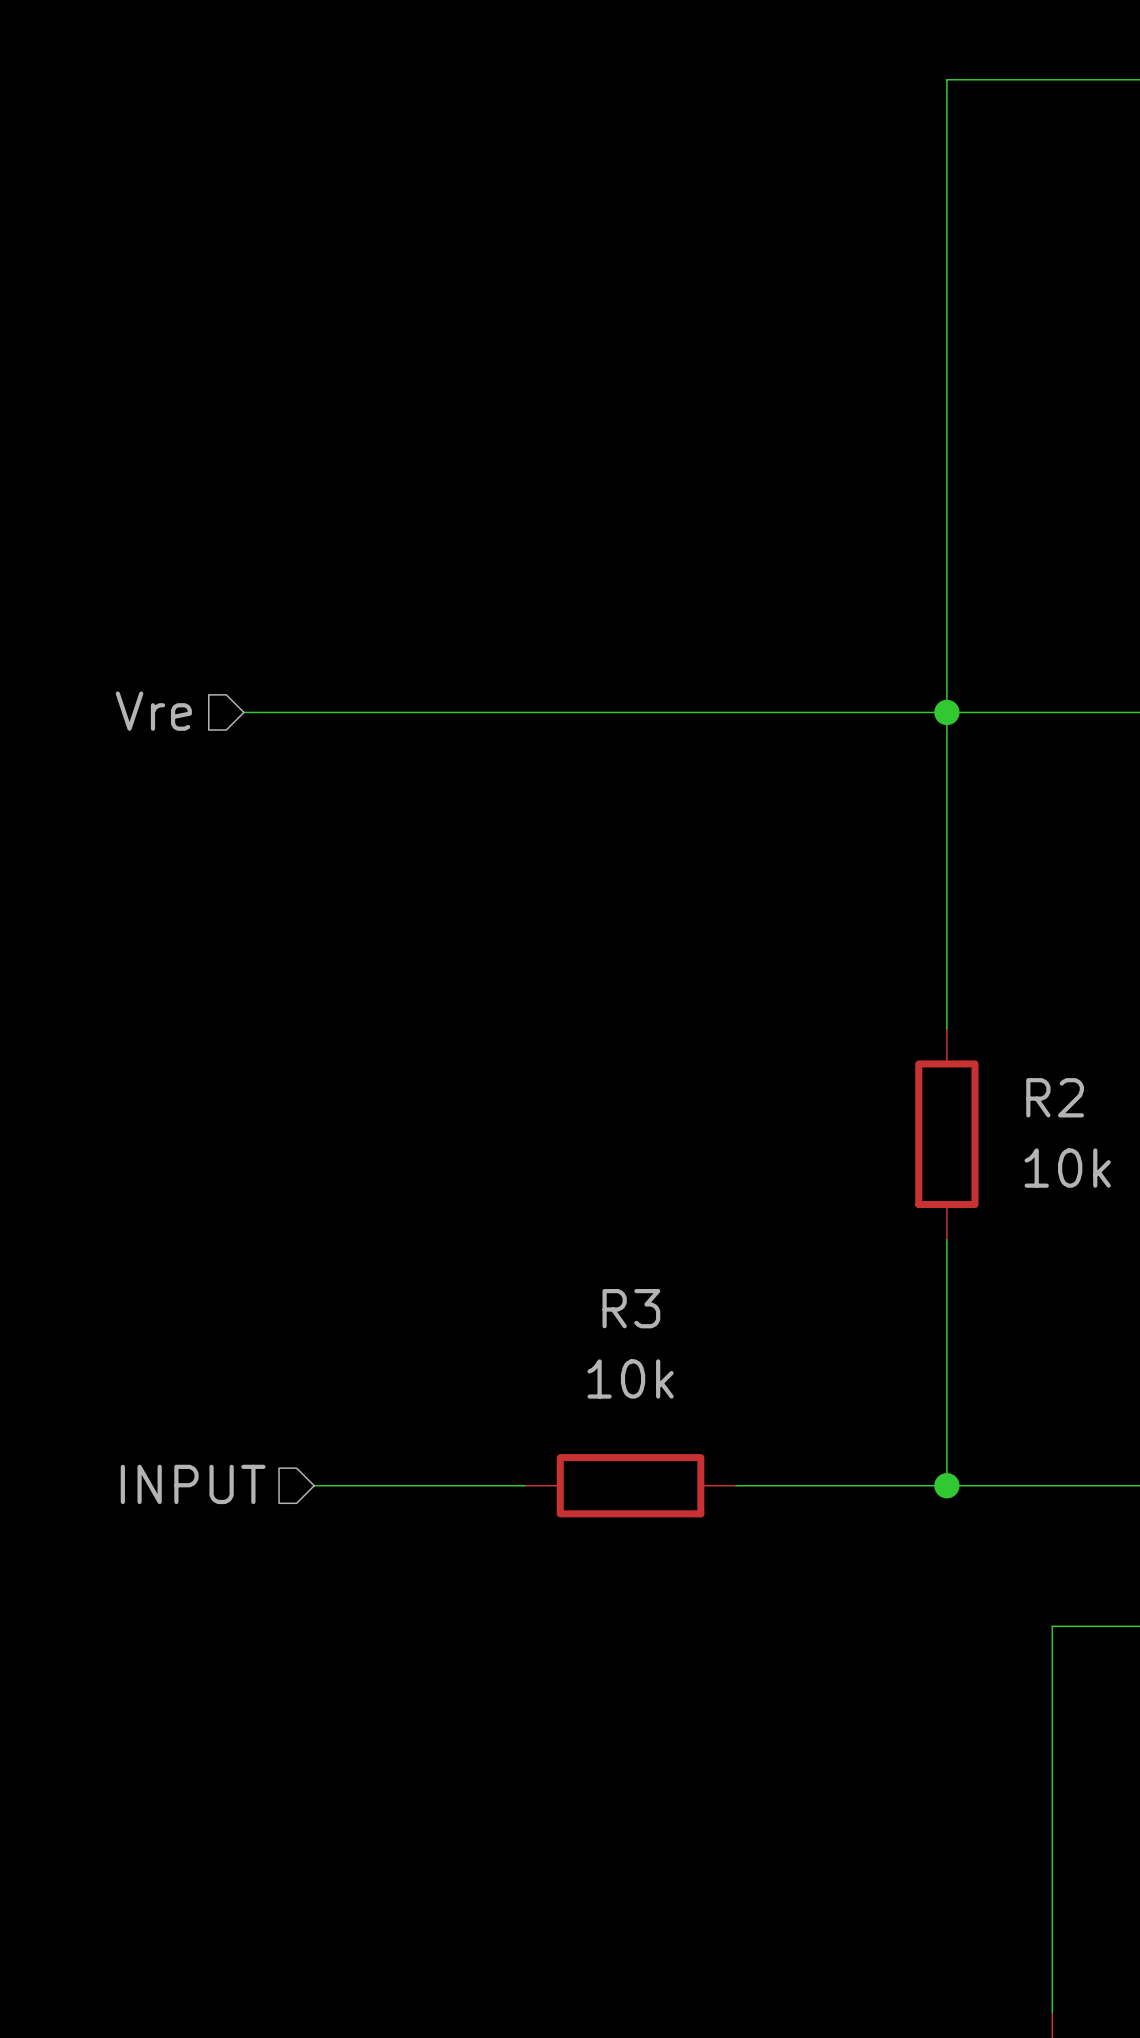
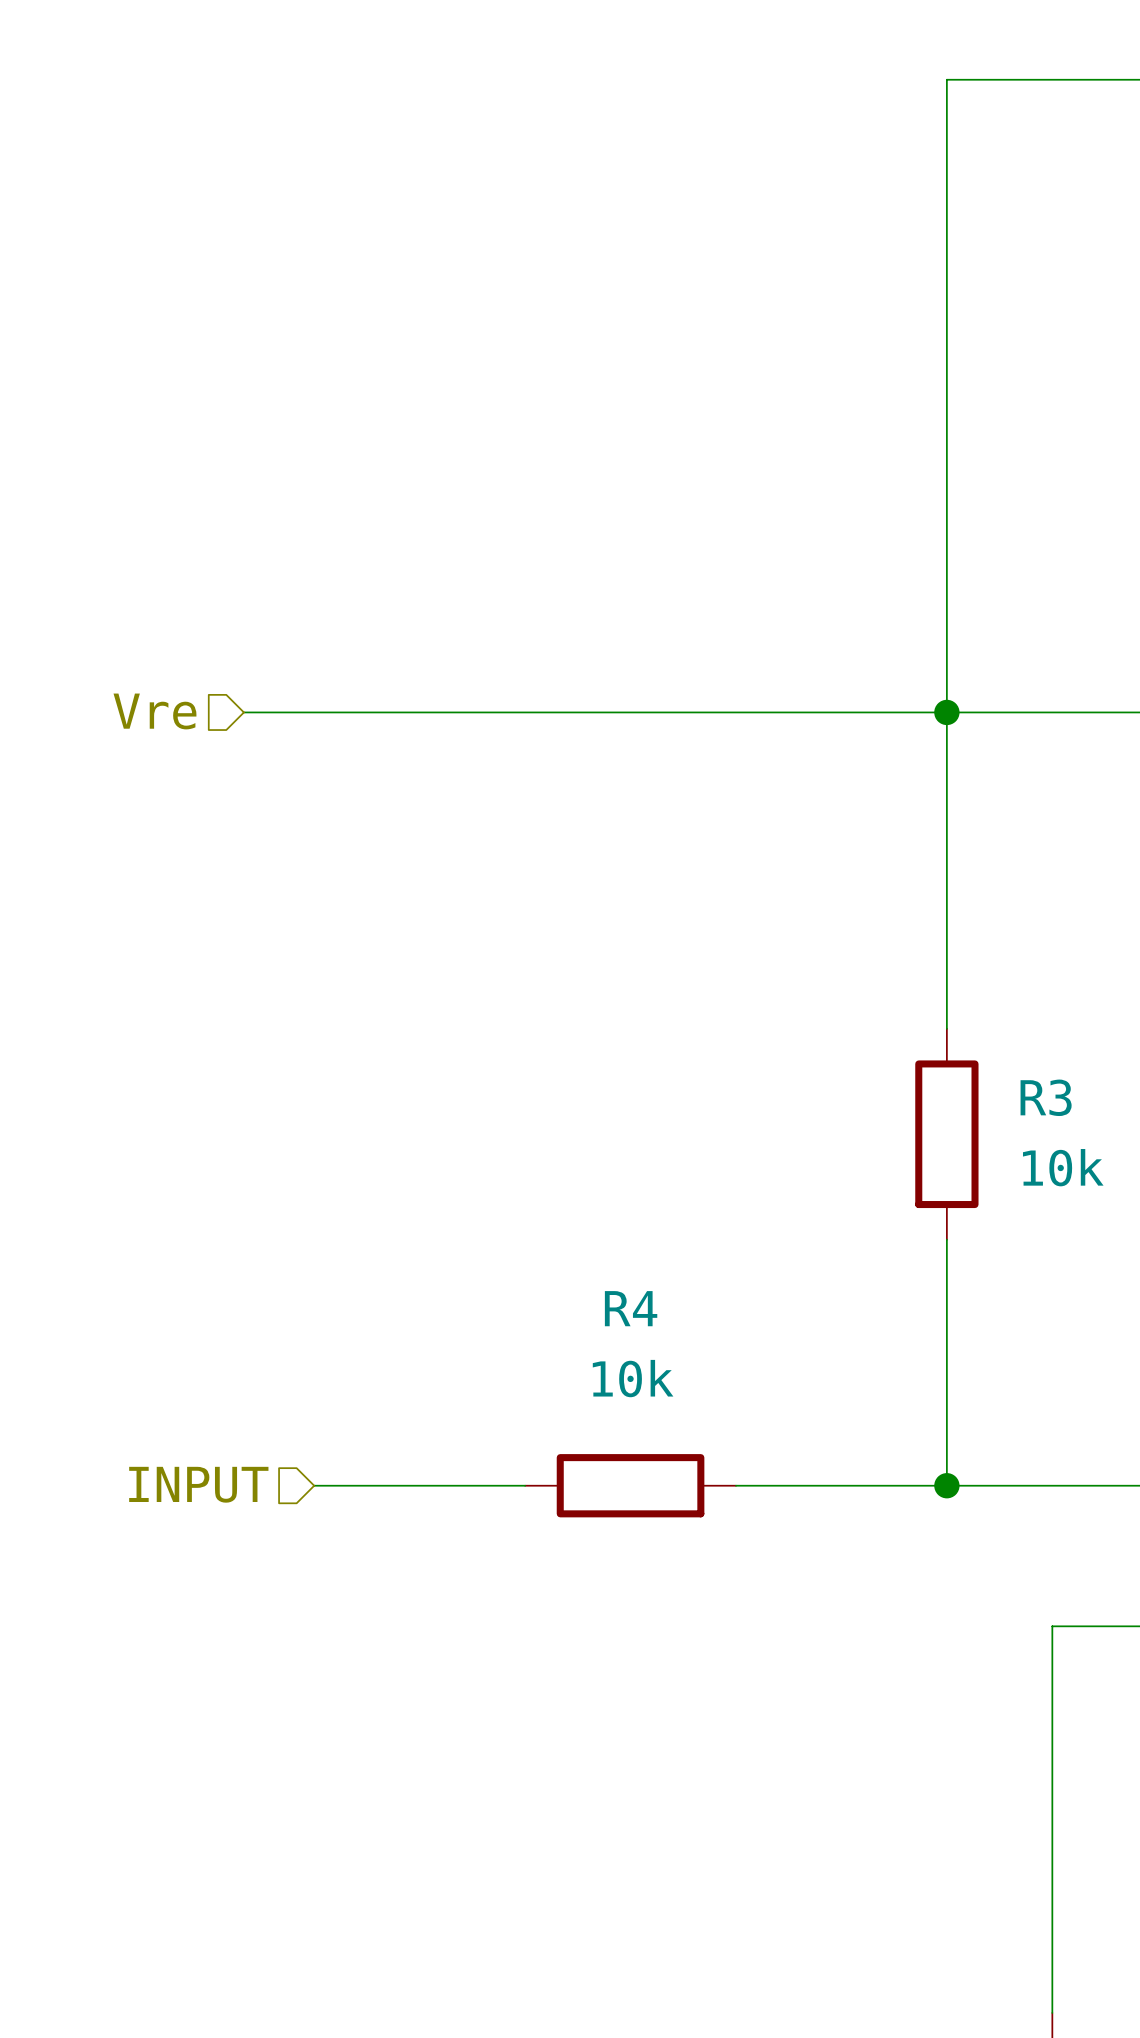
R2 name: R2 (1055, 1097) -> R3 (1046, 1097)
R3 name: R3 (631, 1308) -> R4 (631, 1308)

